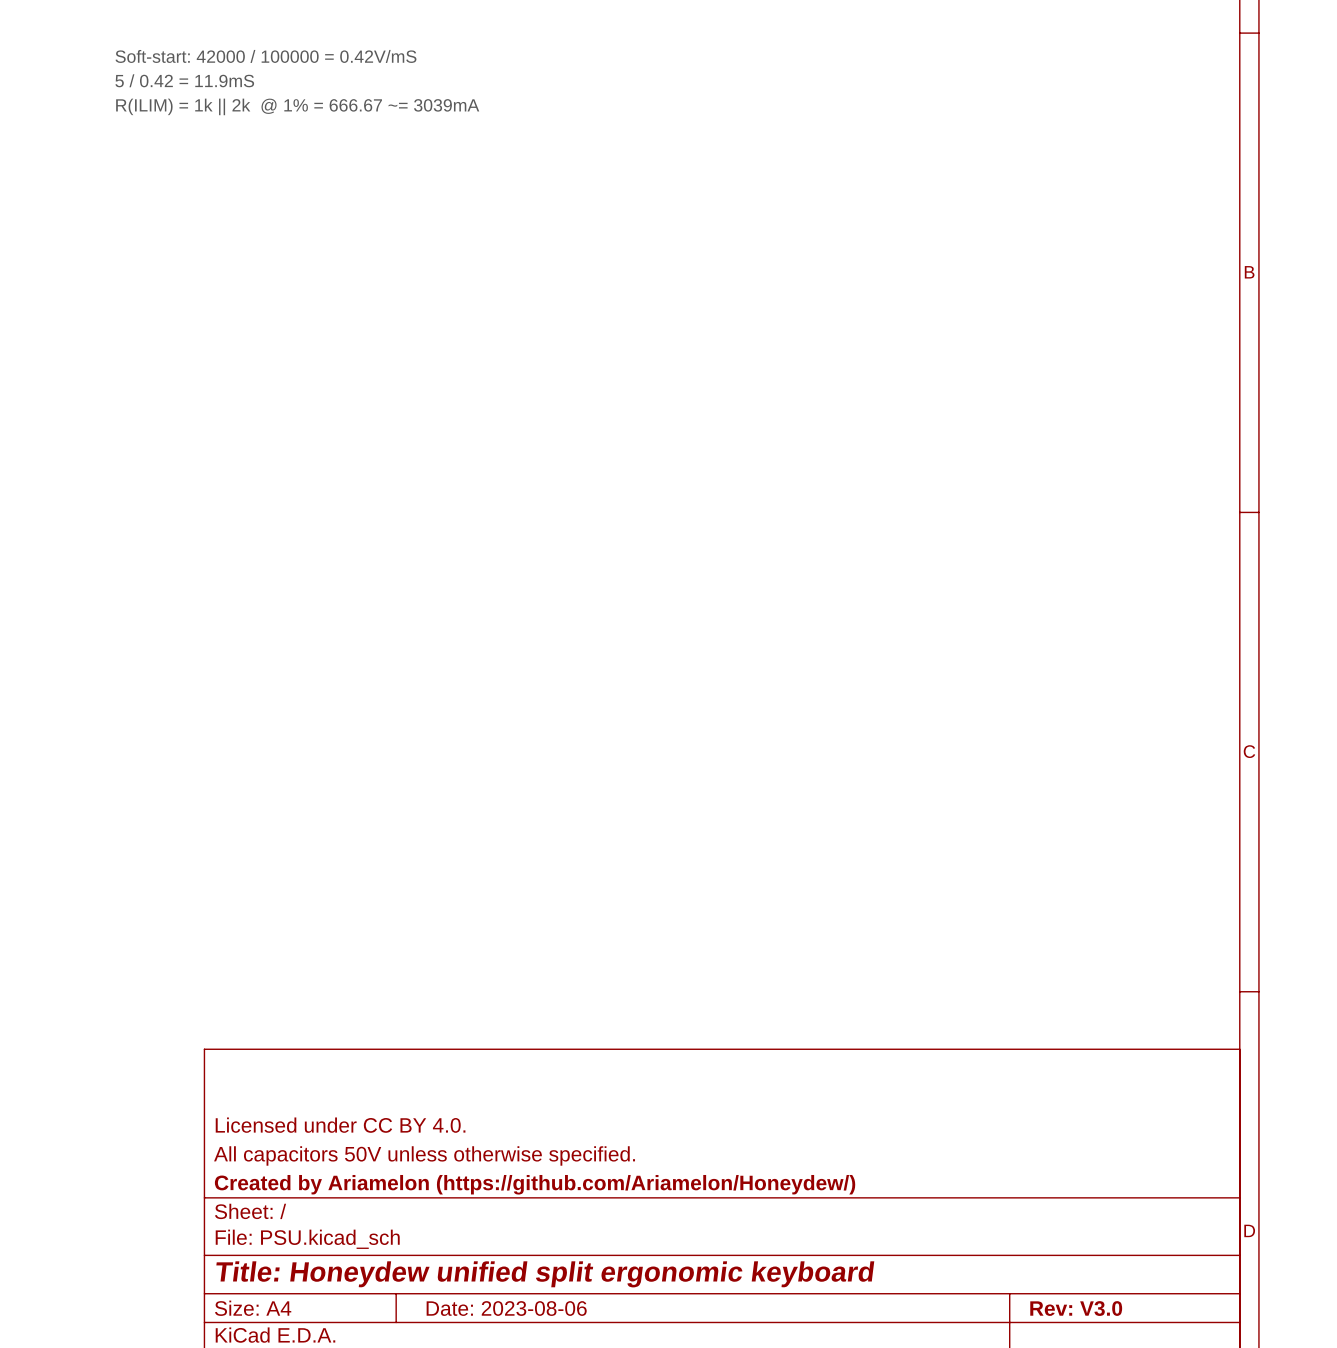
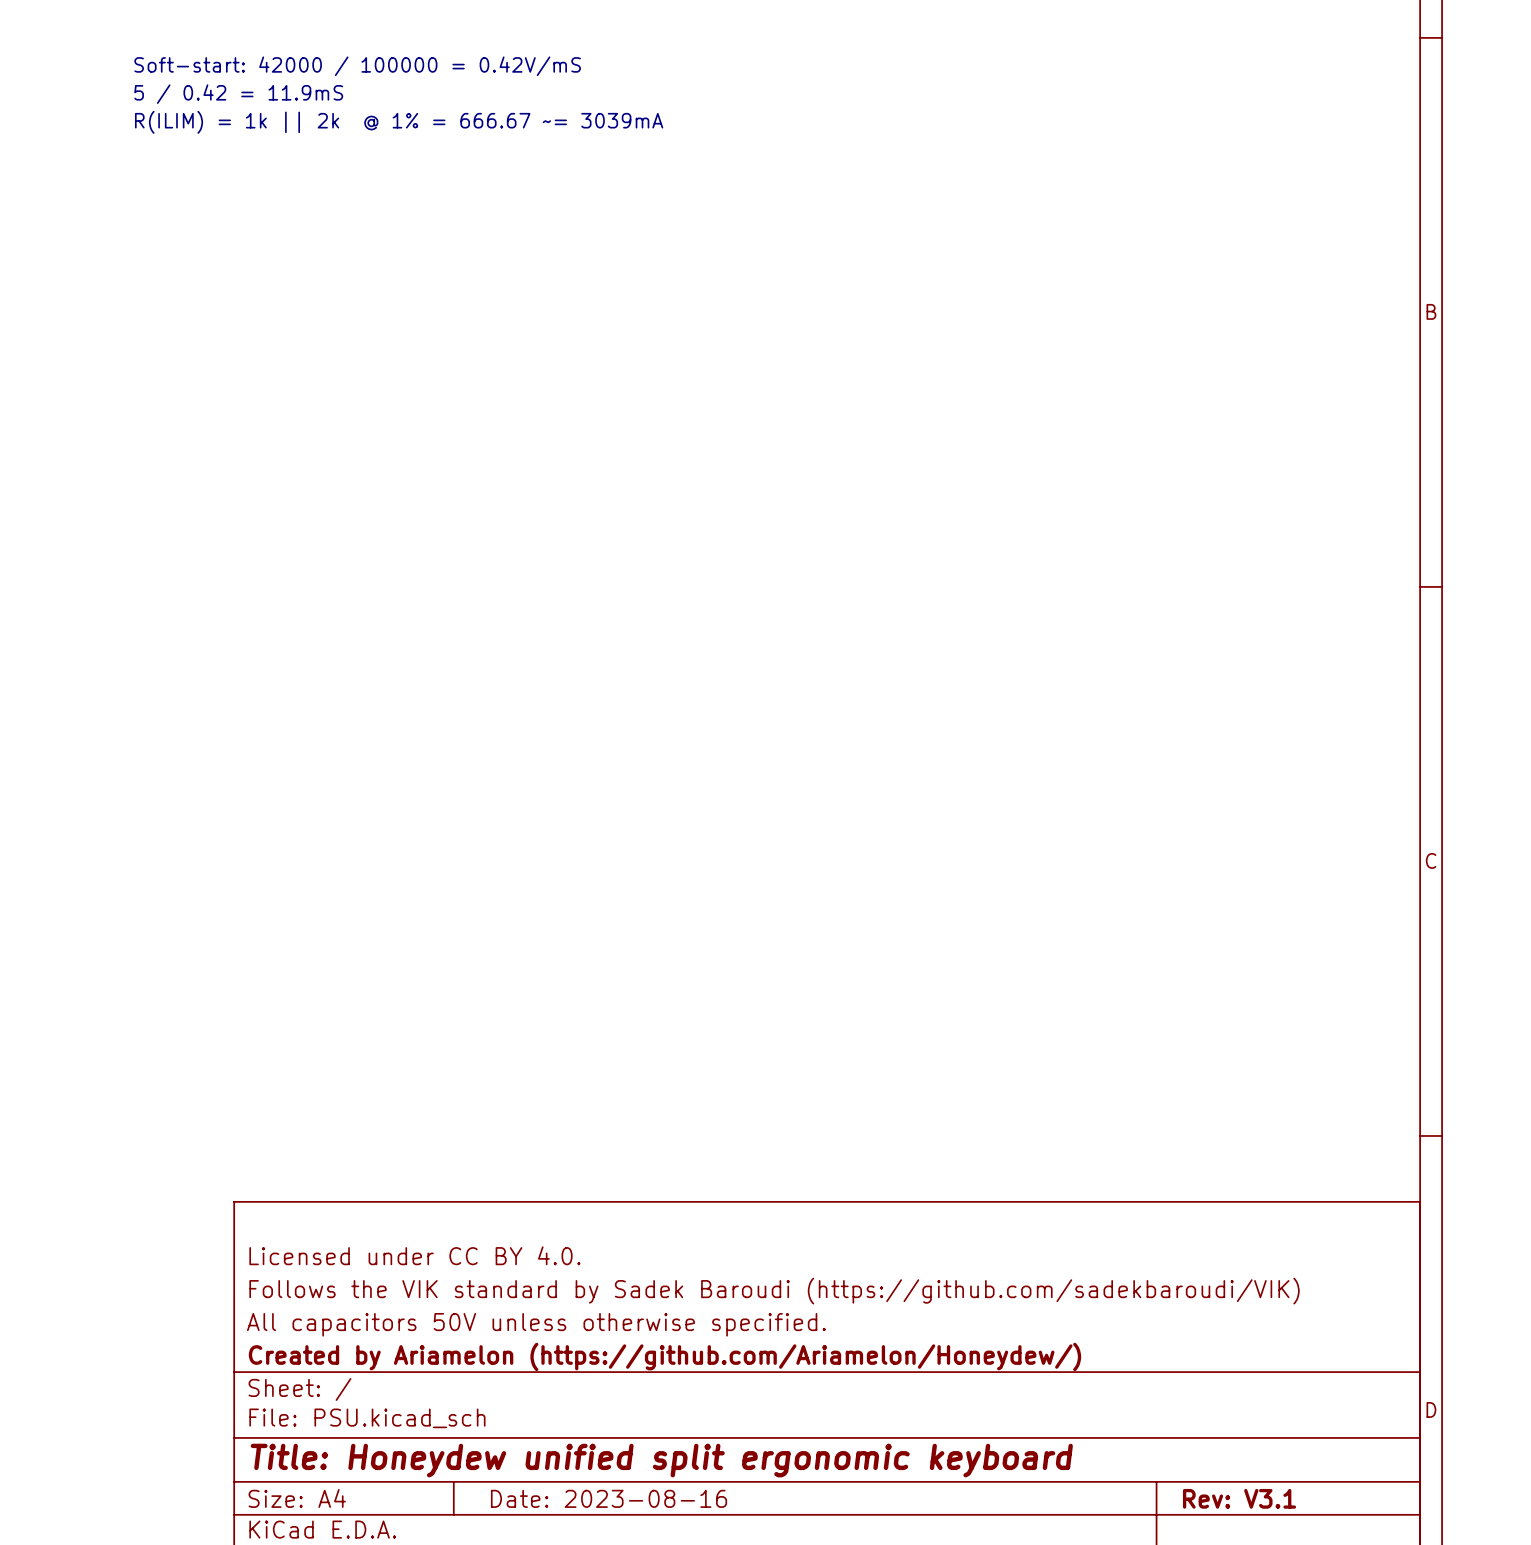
title block: none -> Licensed under CC BY 4.0. (414, 1255)
title block: Licensed under CC BY 4.0. (340, 1125) -> Follows the VIK standard by Sadek Baroudi (https://github.com/sadekbaroudi/VIK) (774, 1291)
title block: Date: 2023-08-06 (506, 1308) -> Date: 2023-08-16 (609, 1498)
title block: Rev: V3.0 (1076, 1308) -> Rev: V3.1 (1239, 1498)

